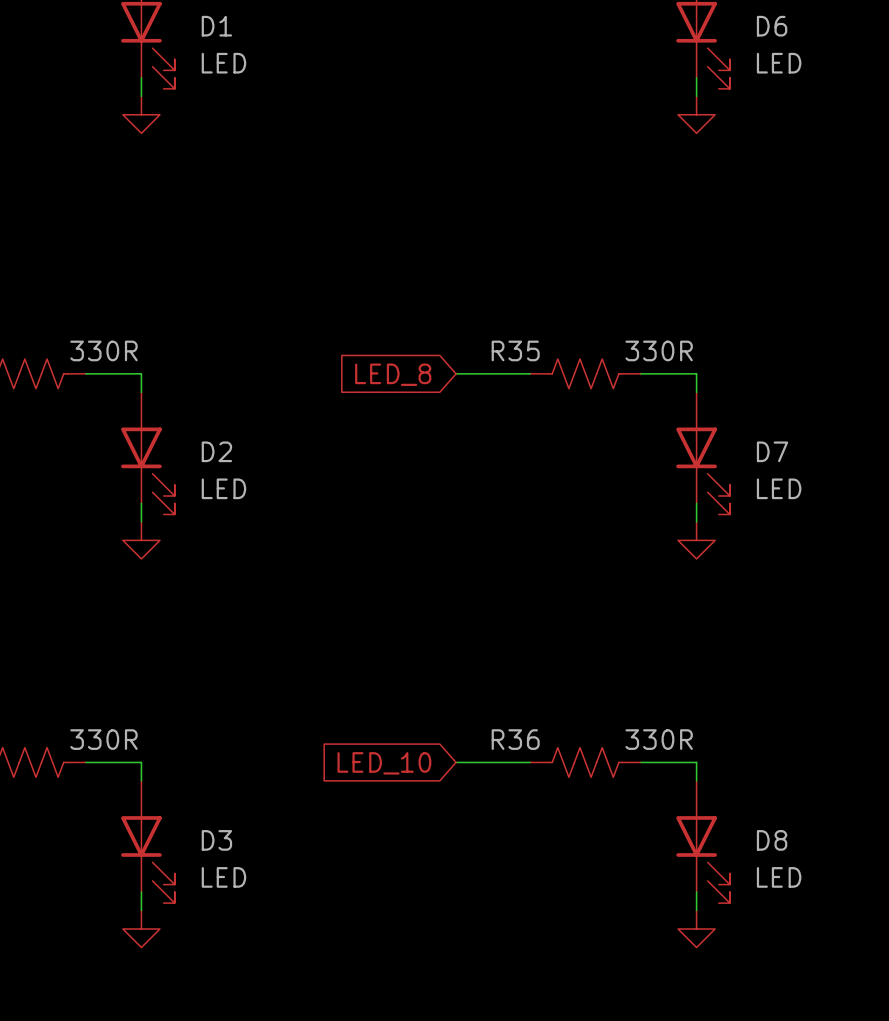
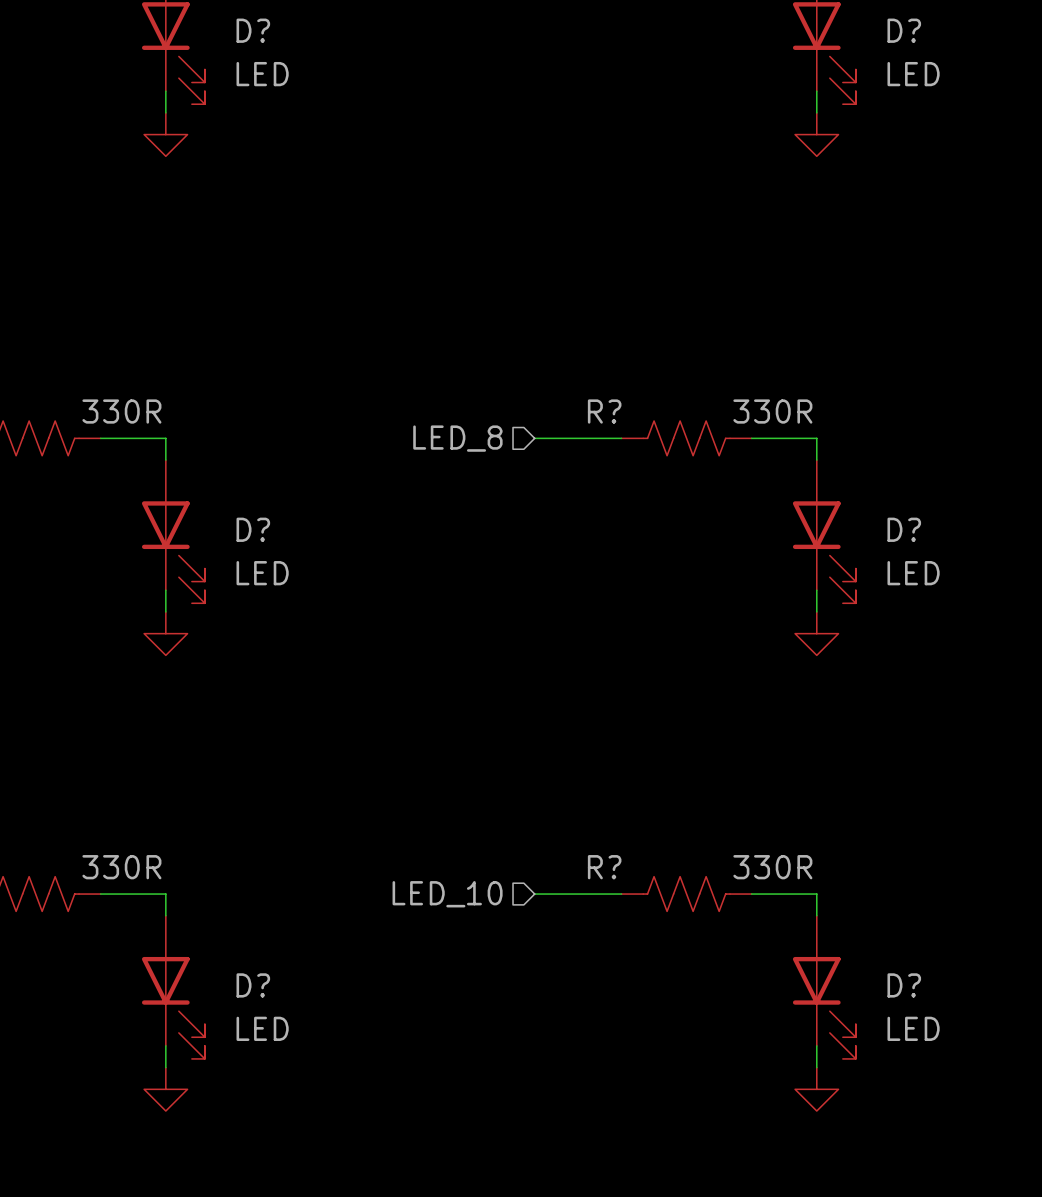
D1 name: D1 (216, 26) -> D? (253, 30)
D6 name: D6 (772, 26) -> D? (904, 30)
R35 name: R35 (515, 350) -> R? (604, 411)
hierarchical label: none -> LED_8 (457, 438)
global label: LED_8 (393, 374) -> none
D2 name: D2 (216, 451) -> D? (253, 529)
D7 name: D7 (772, 451) -> D? (904, 529)
R36 name: R36 (515, 739) -> R? (604, 867)
hierarchical label: none -> LED_10 (447, 894)
global label: LED_10 (384, 763) -> none
D3 name: D3 (216, 840) -> D? (253, 985)
D8 name: D8 (772, 840) -> D? (904, 985)

